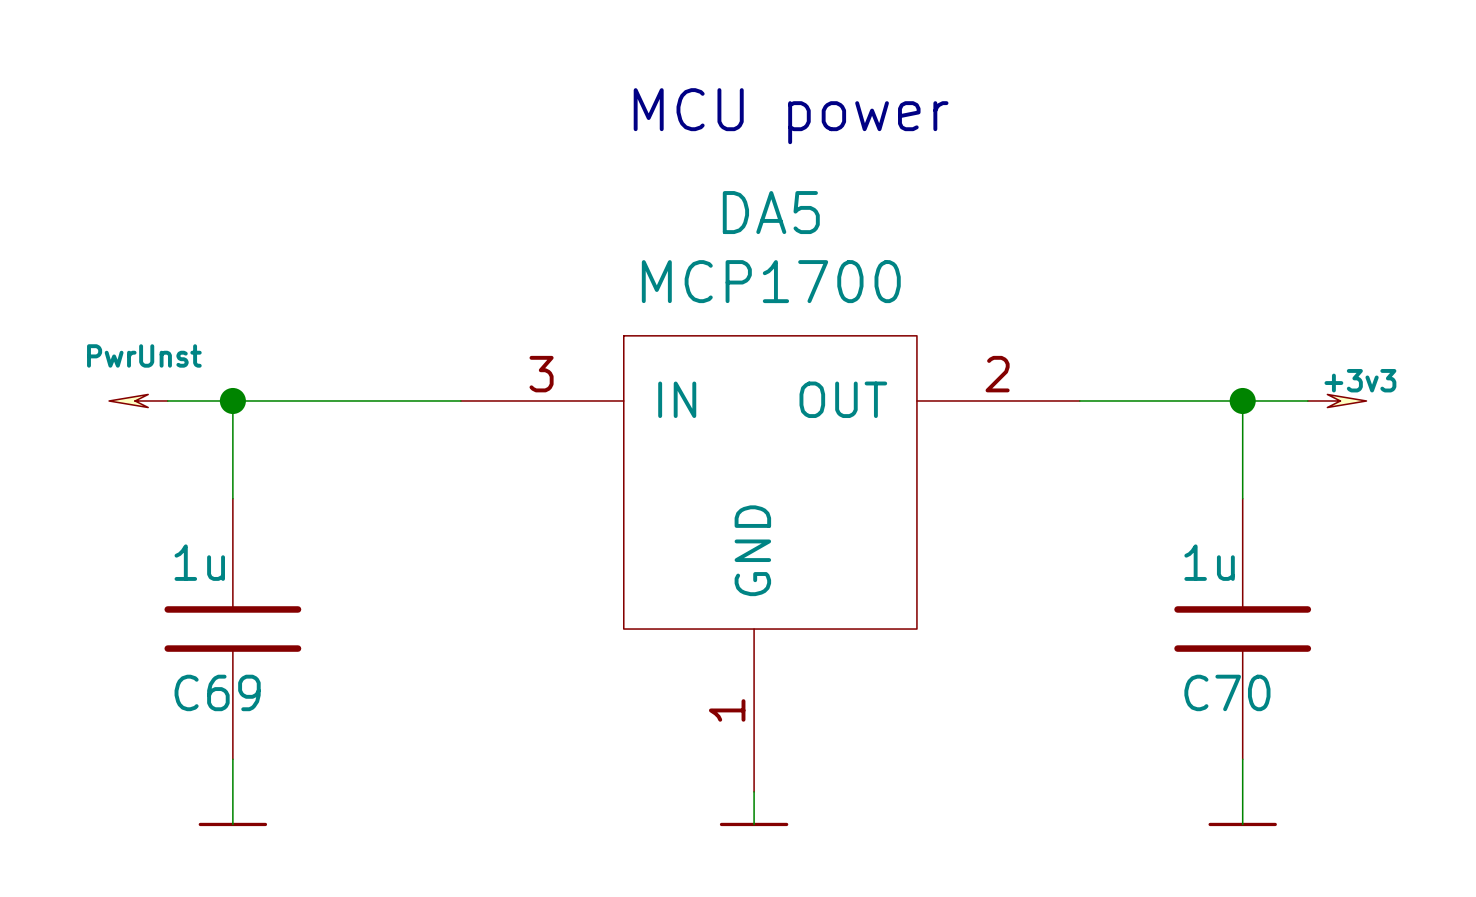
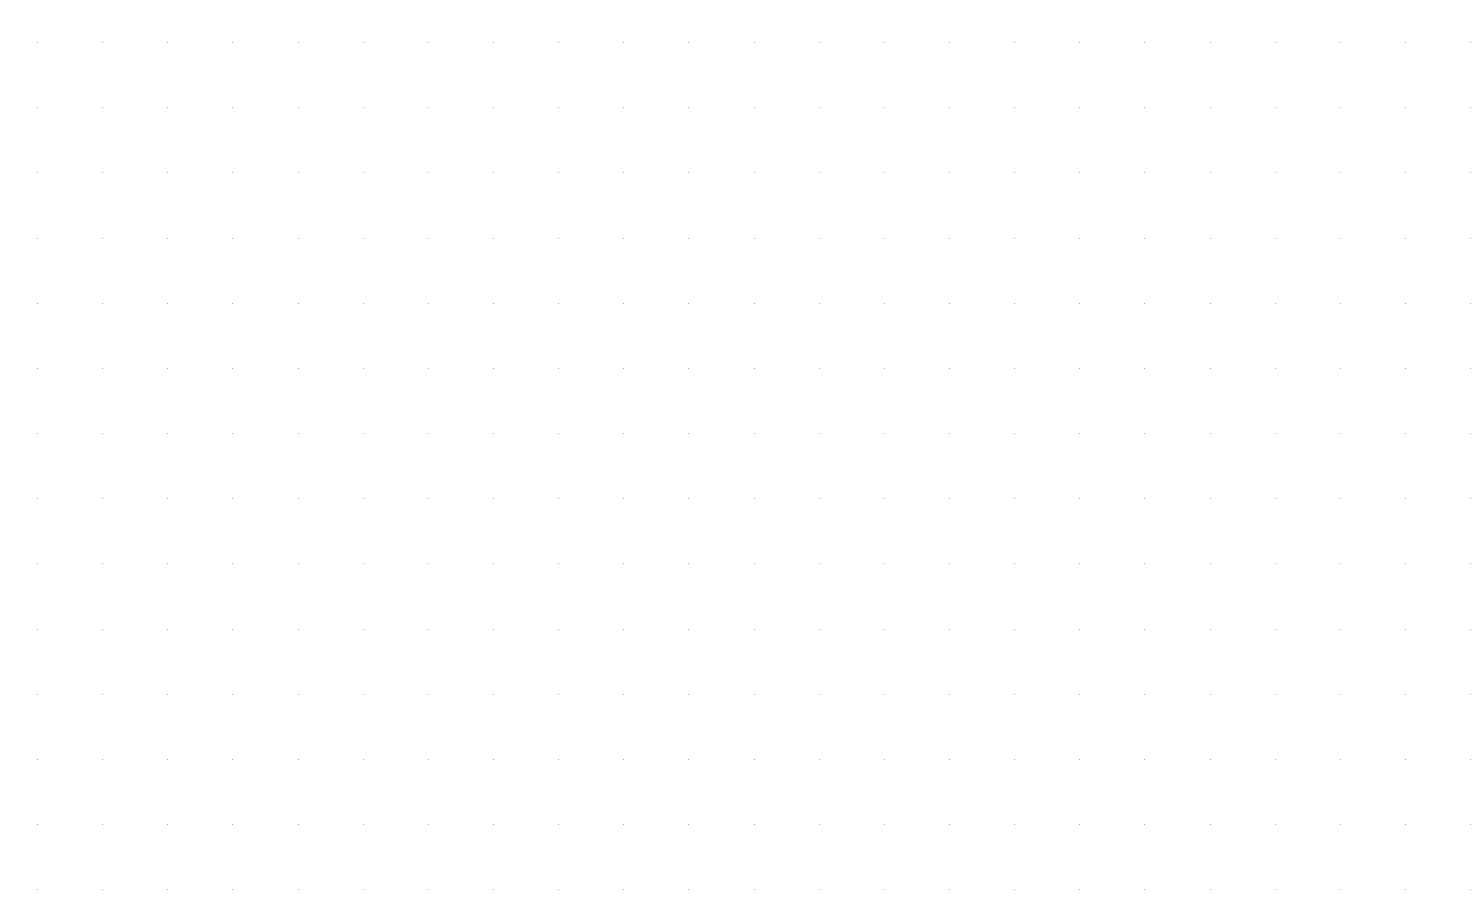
text: MCU power (791, 116) -> none
power symbol: PwrUnst (138, 400) -> none
wire: (167, 400) (460, 400) -> none
wire: (232, 400) (232, 498) -> none
junction: (232, 400) -> none
wire: (1079, 400) (1307, 400) -> none
wire: (1242, 400) (1242, 498) -> none
junction: (1242, 400) -> none
power symbol: +3v3 (1337, 400) -> none
DA5: MCP1700 (770, 563) -> none
C69: 1u (232, 629) -> none
C70: 1u (1242, 629) -> none
wire: (232, 759) (232, 824) -> none
wire: (1242, 759) (1242, 824) -> none
wire: (754, 791) (754, 824) -> none
power symbol: (232, 824) -> none
power symbol: (754, 824) -> none
power symbol: (1242, 824) -> none

